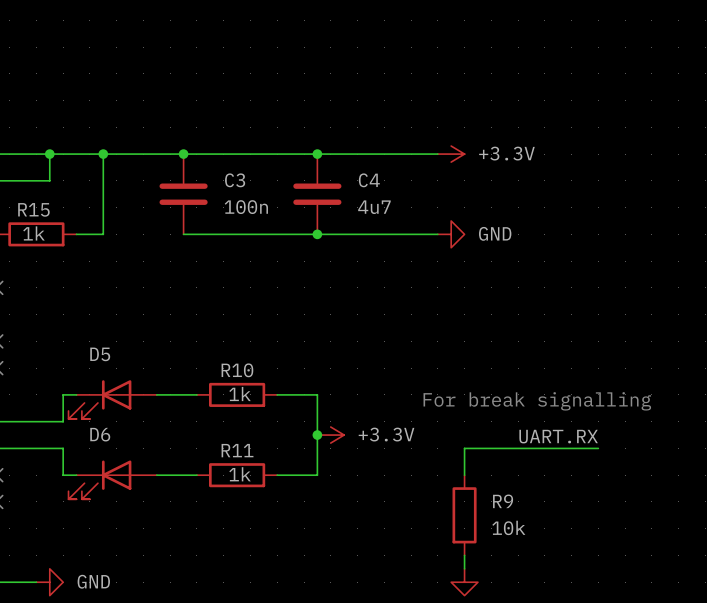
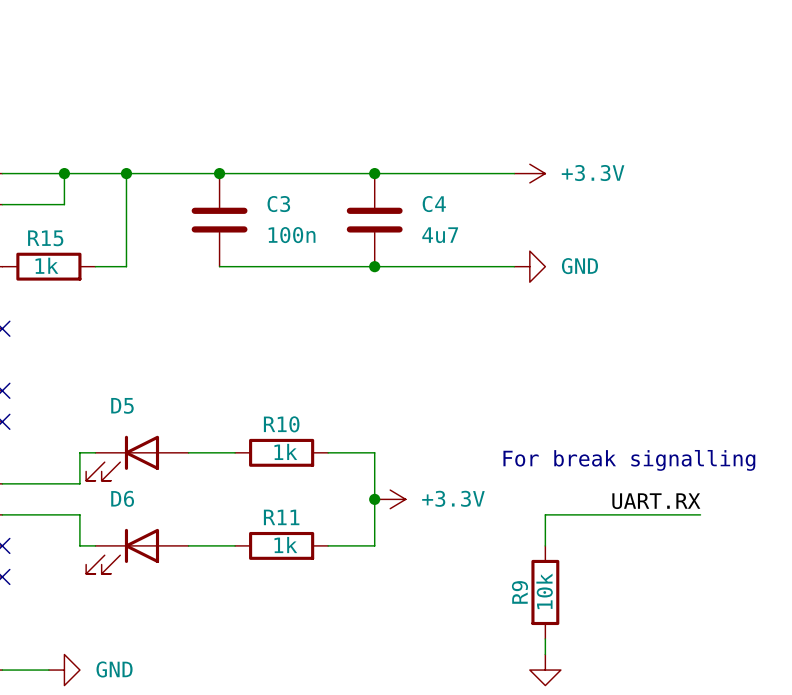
R9 name rotation: 0° (503, 501) -> 90° counterclockwise (519, 592)
R9 name position: R9 (503, 501) -> R9 (519, 592)
R9 value rotation: 0° (508, 527) -> 90° counterclockwise (544, 591)
R9 value position: 10k (508, 527) -> 10k (544, 591)

